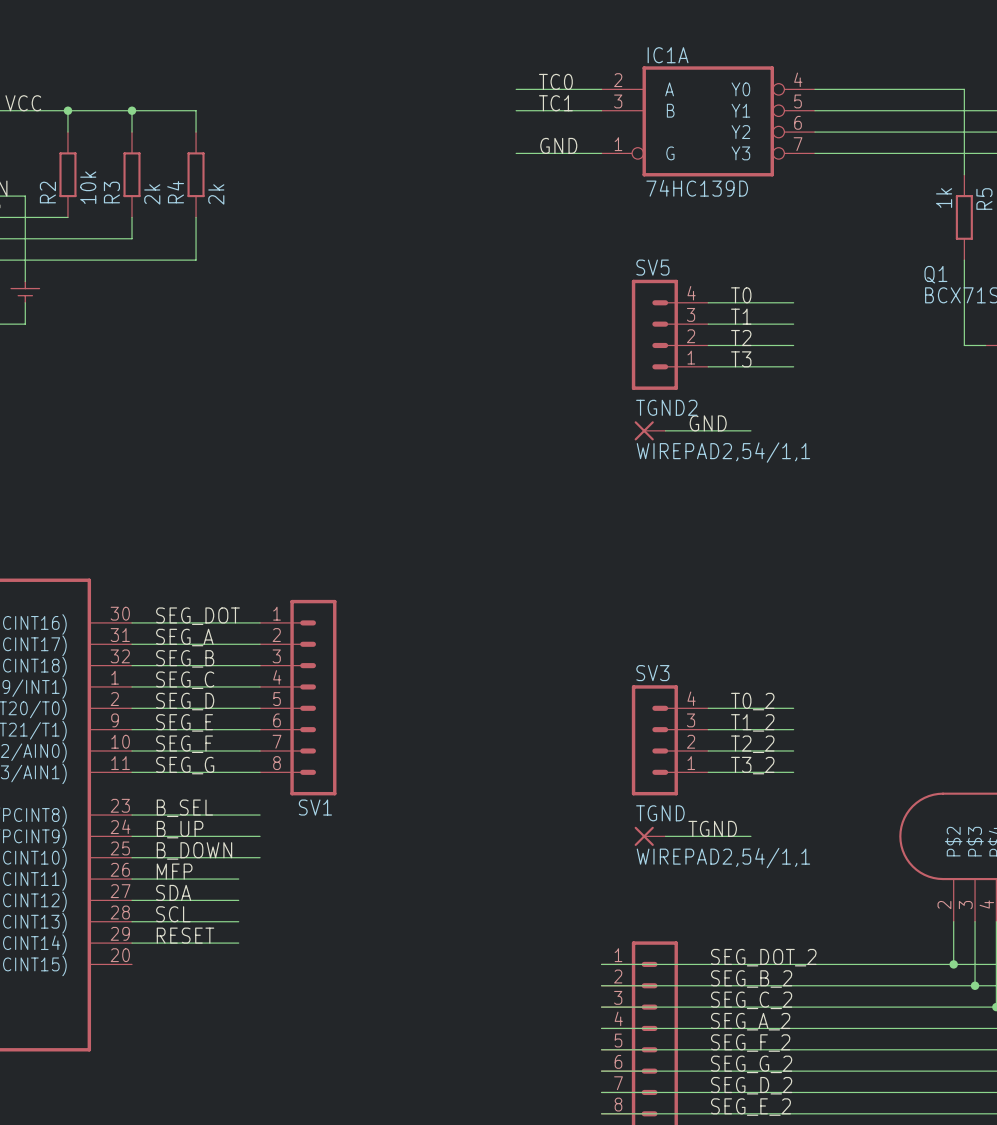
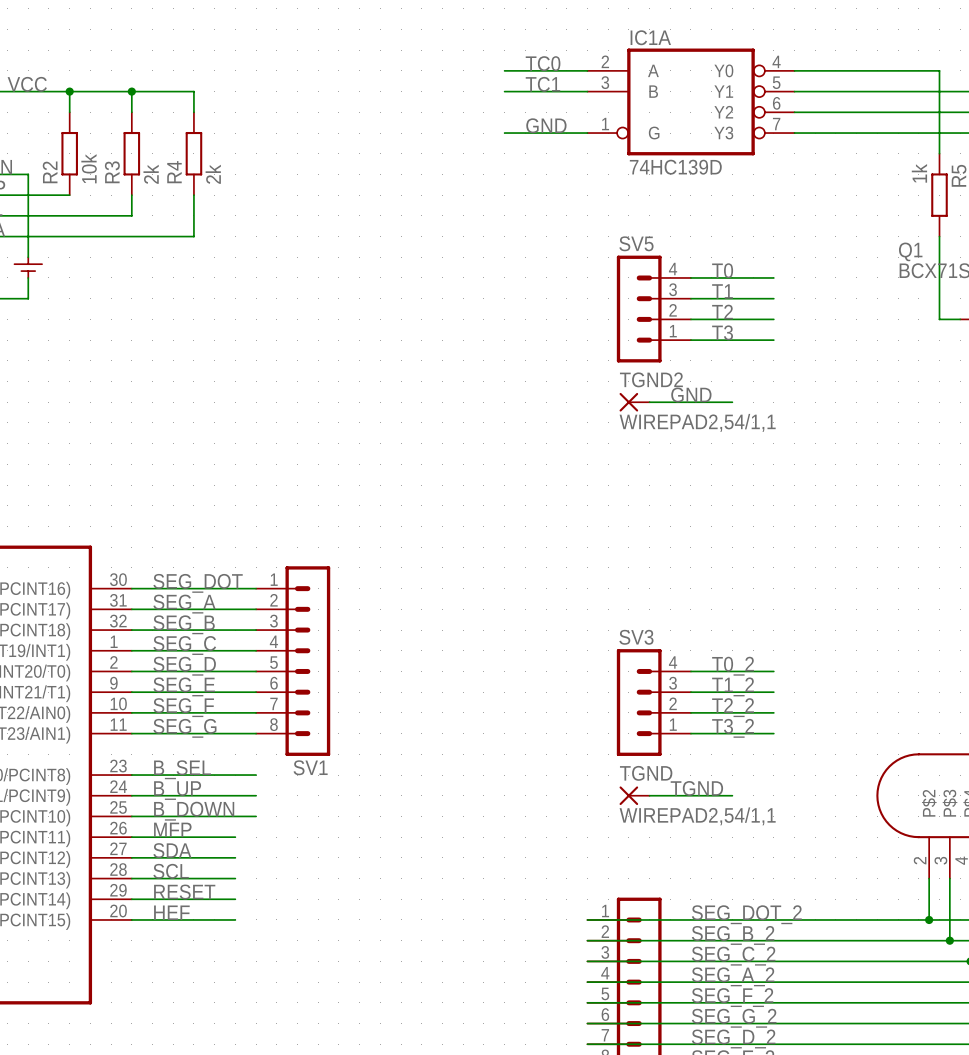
label: none -> HEF (171, 912)
wire: none -> (131, 919) (235, 919)

